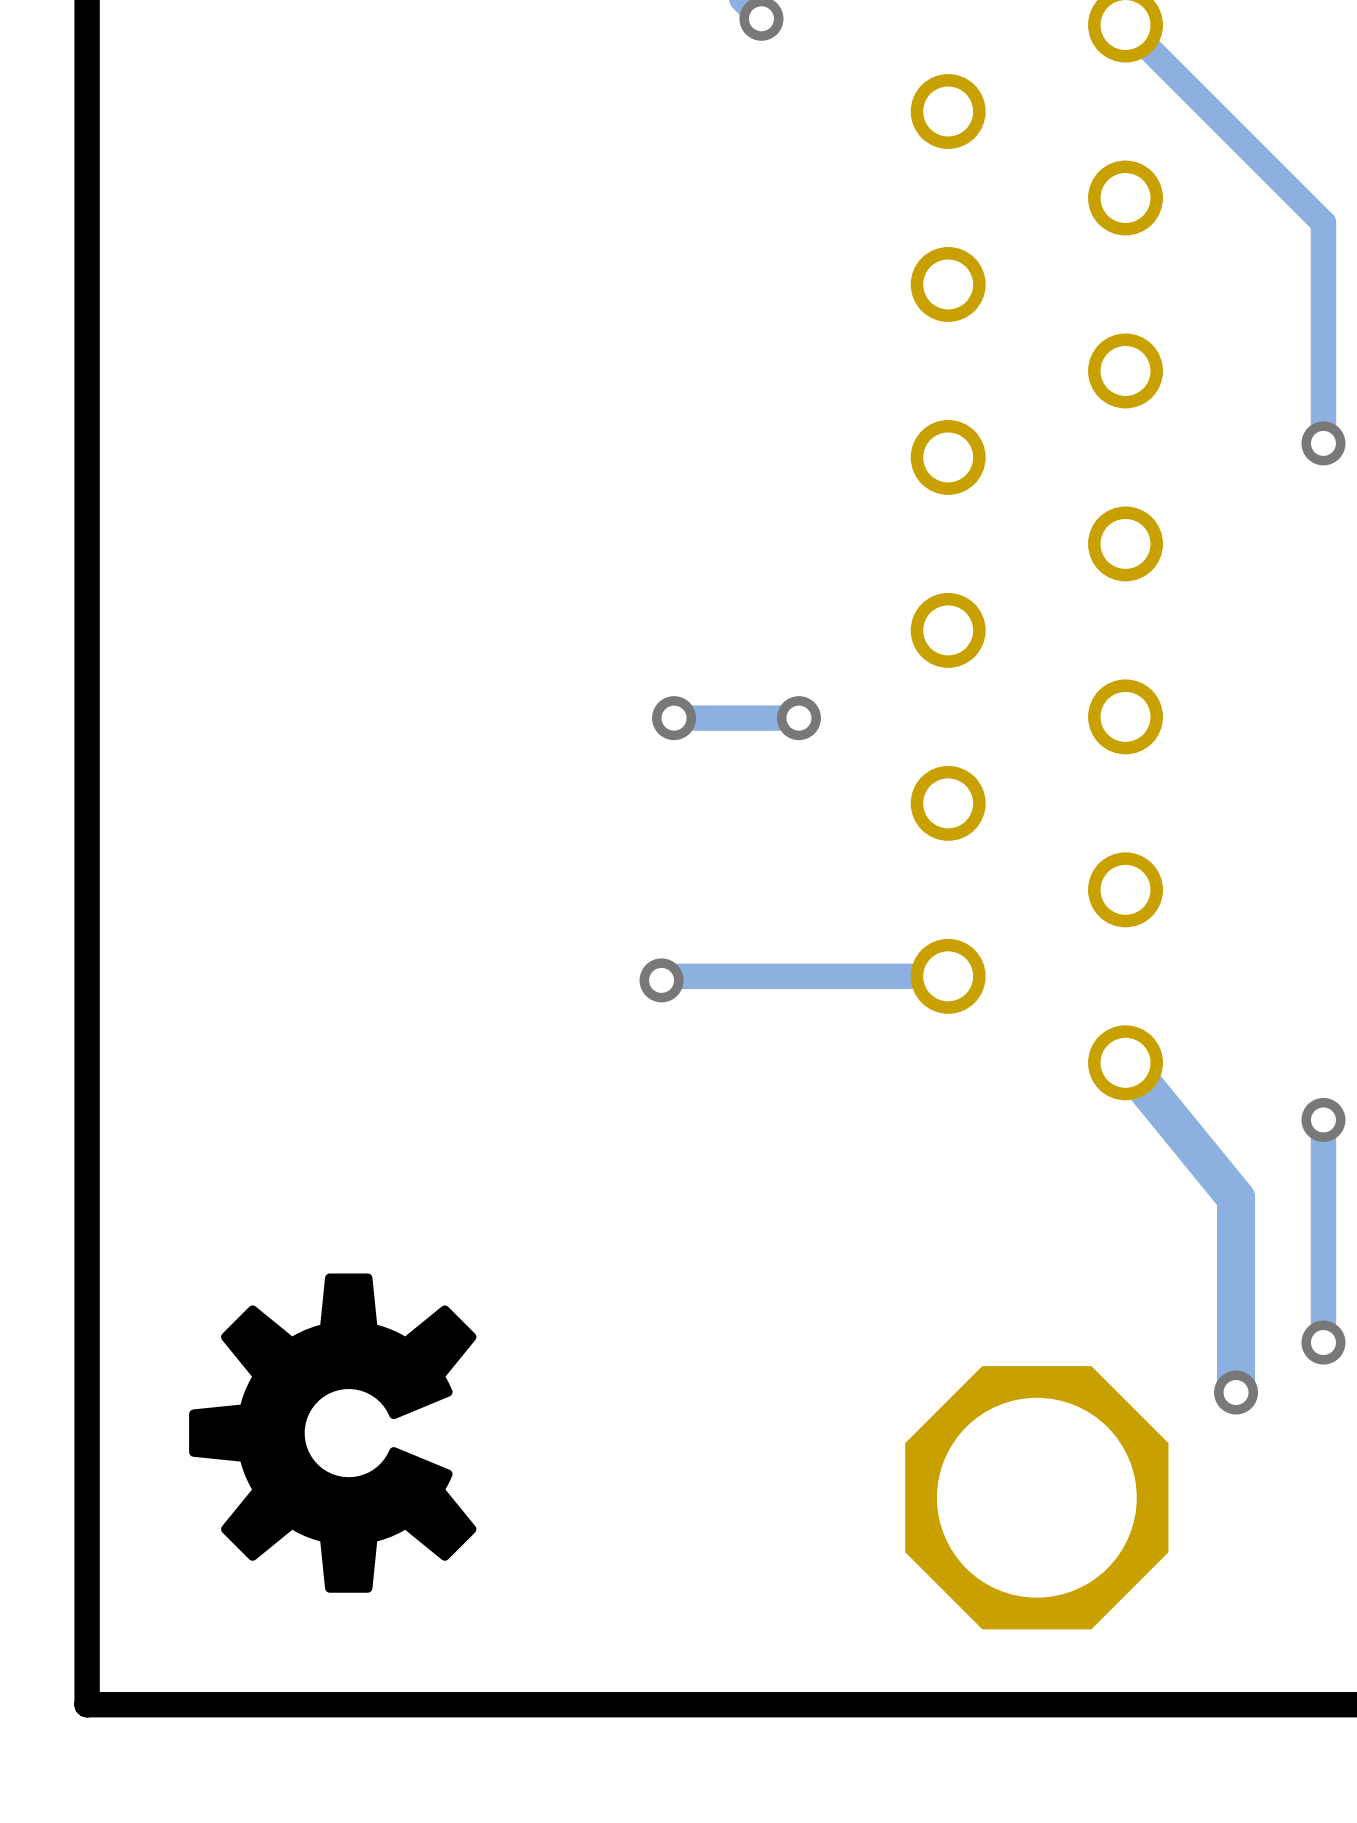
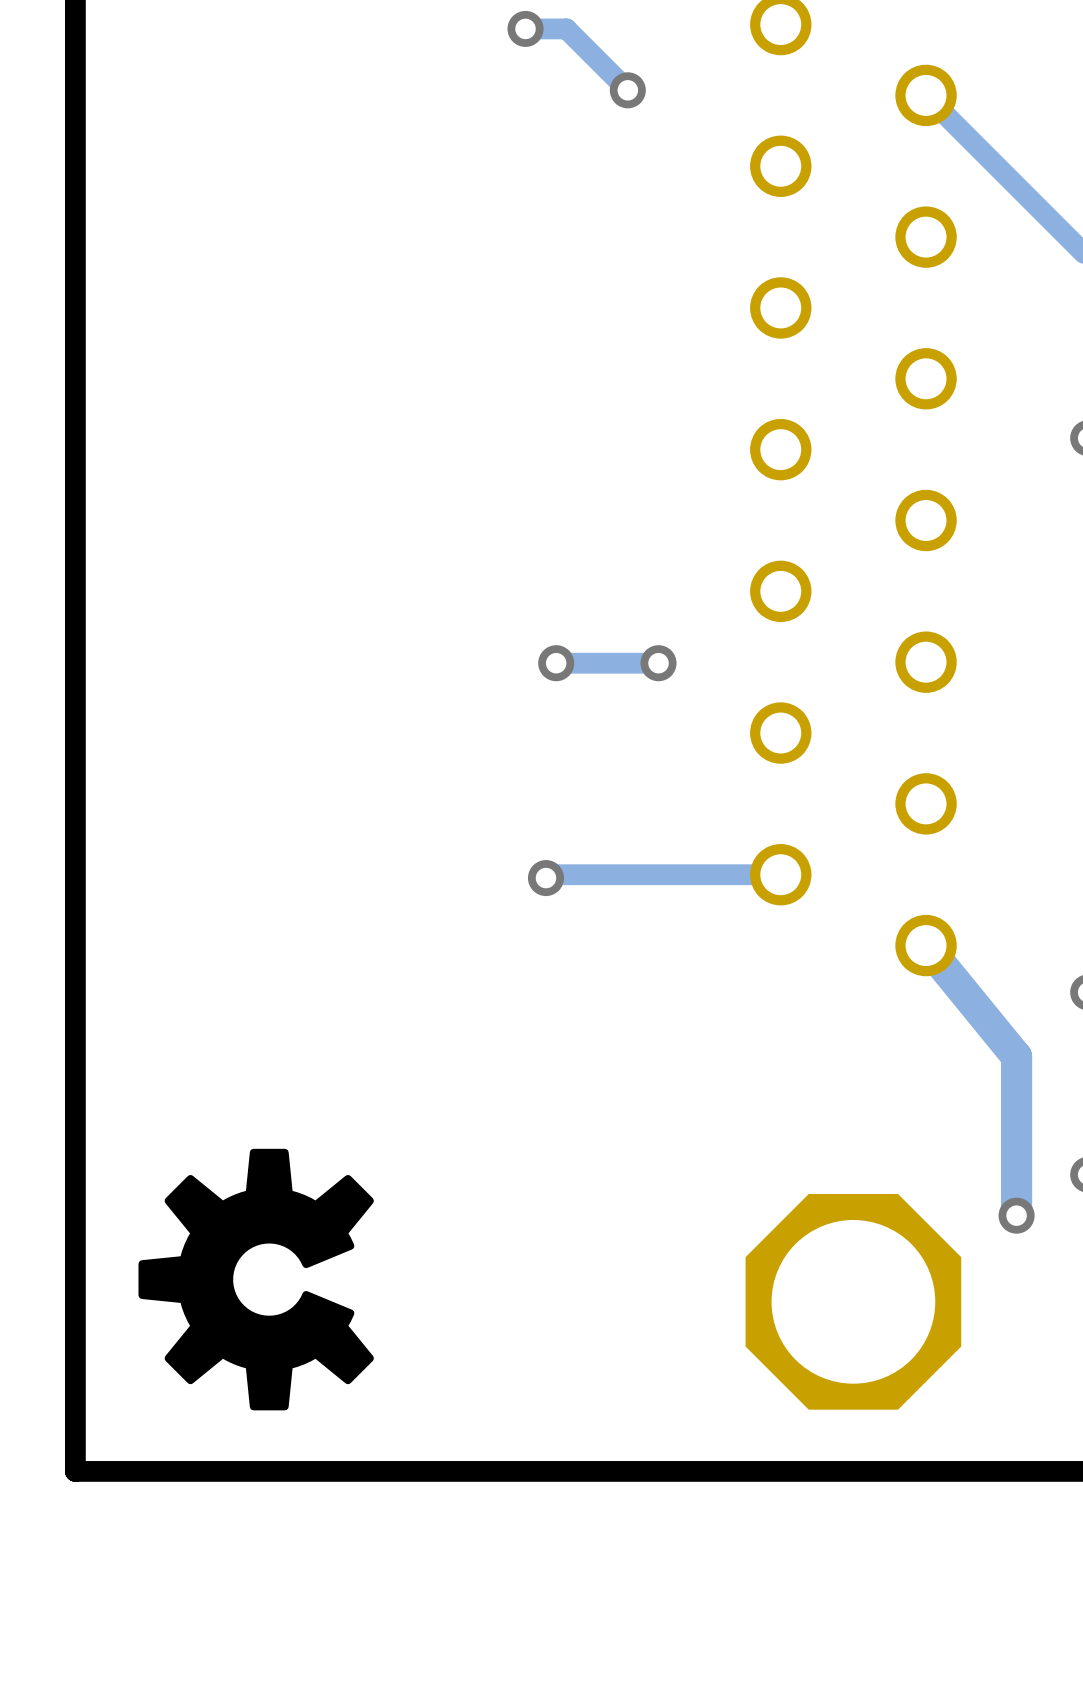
drawing position: (332, 1433) -> (256, 1279)

